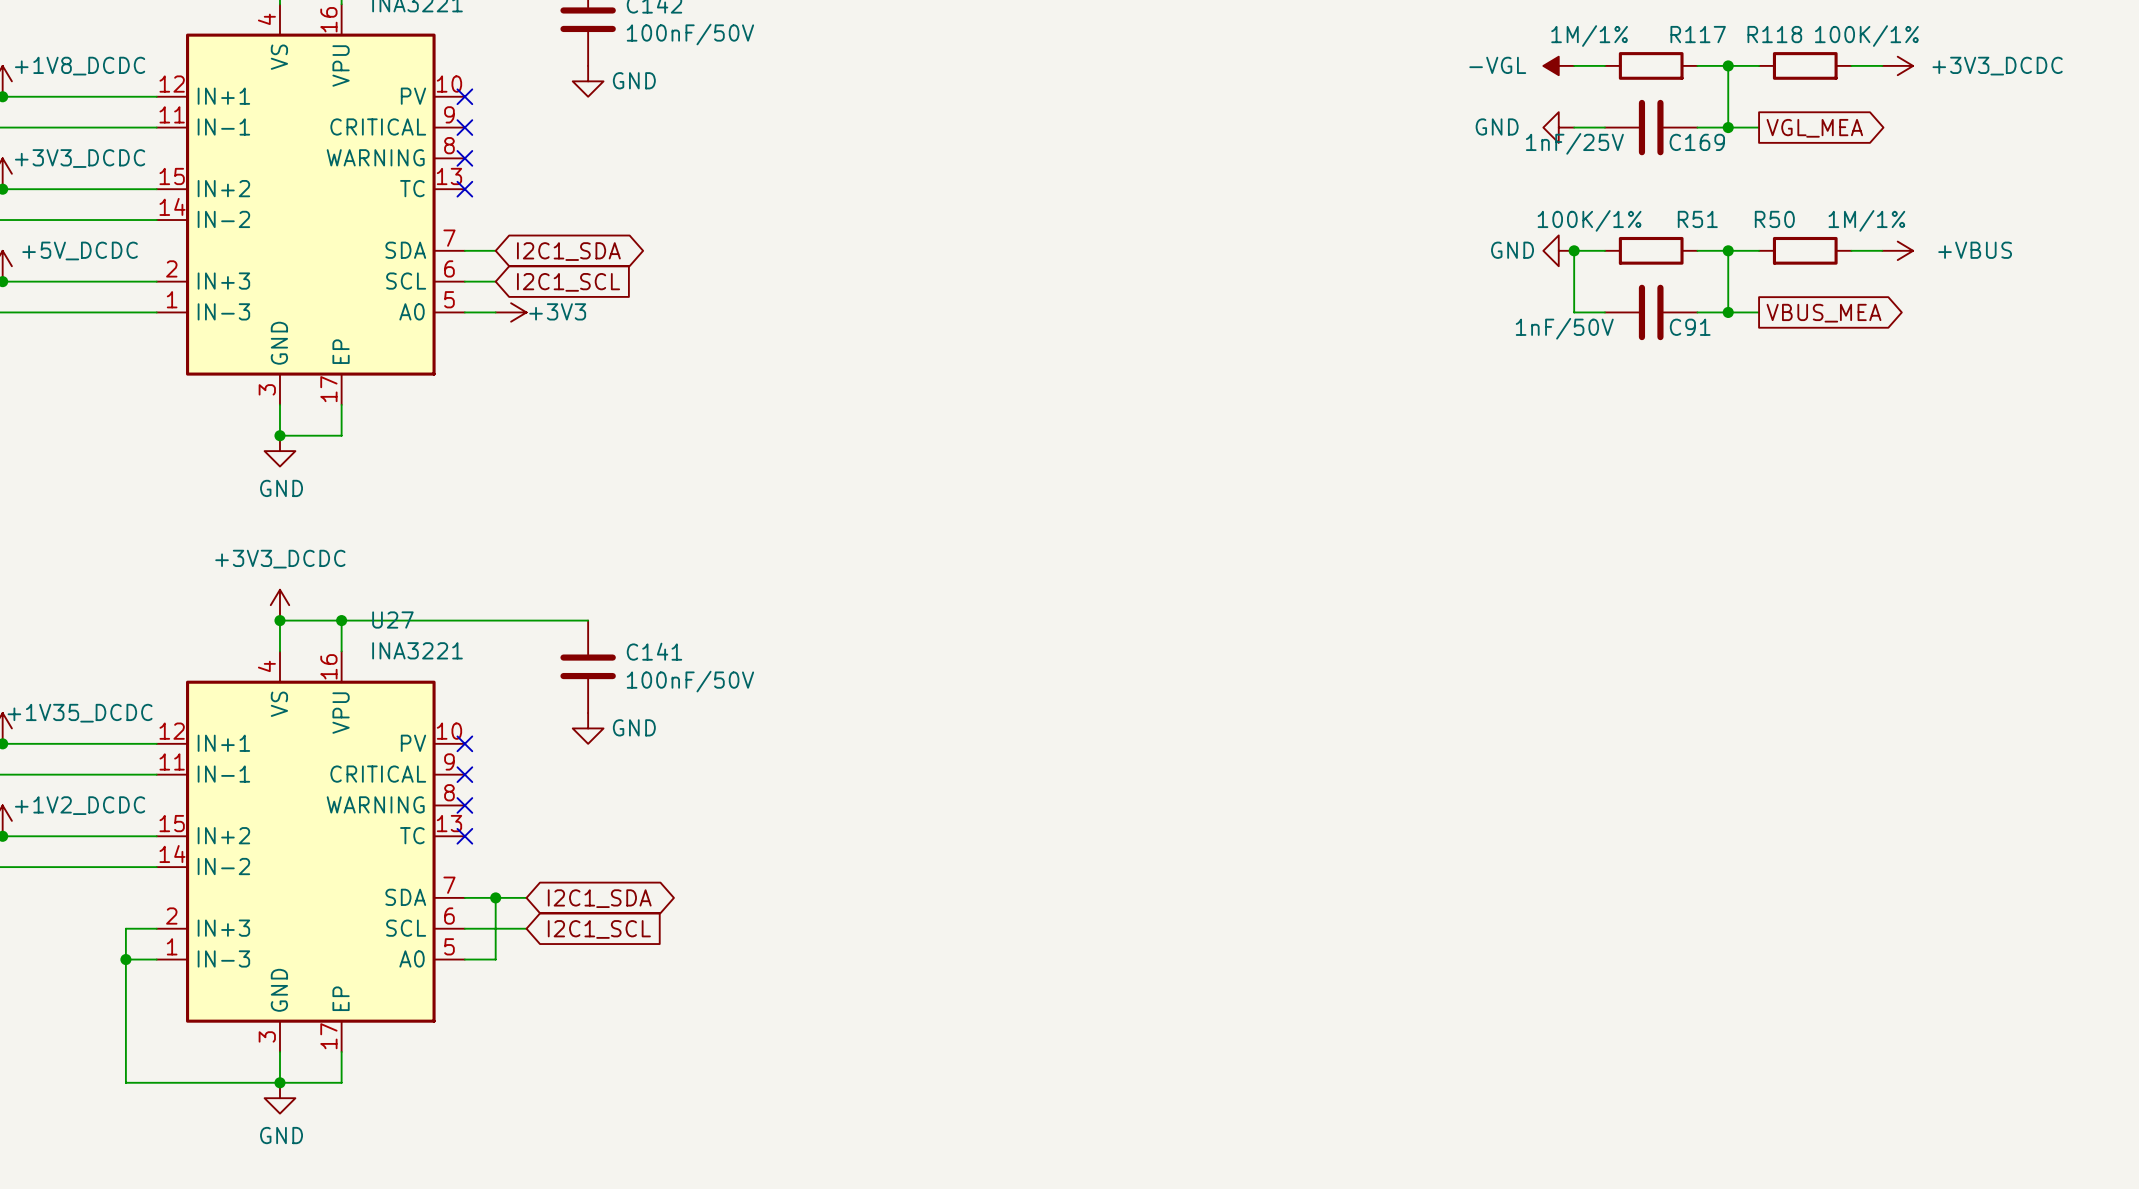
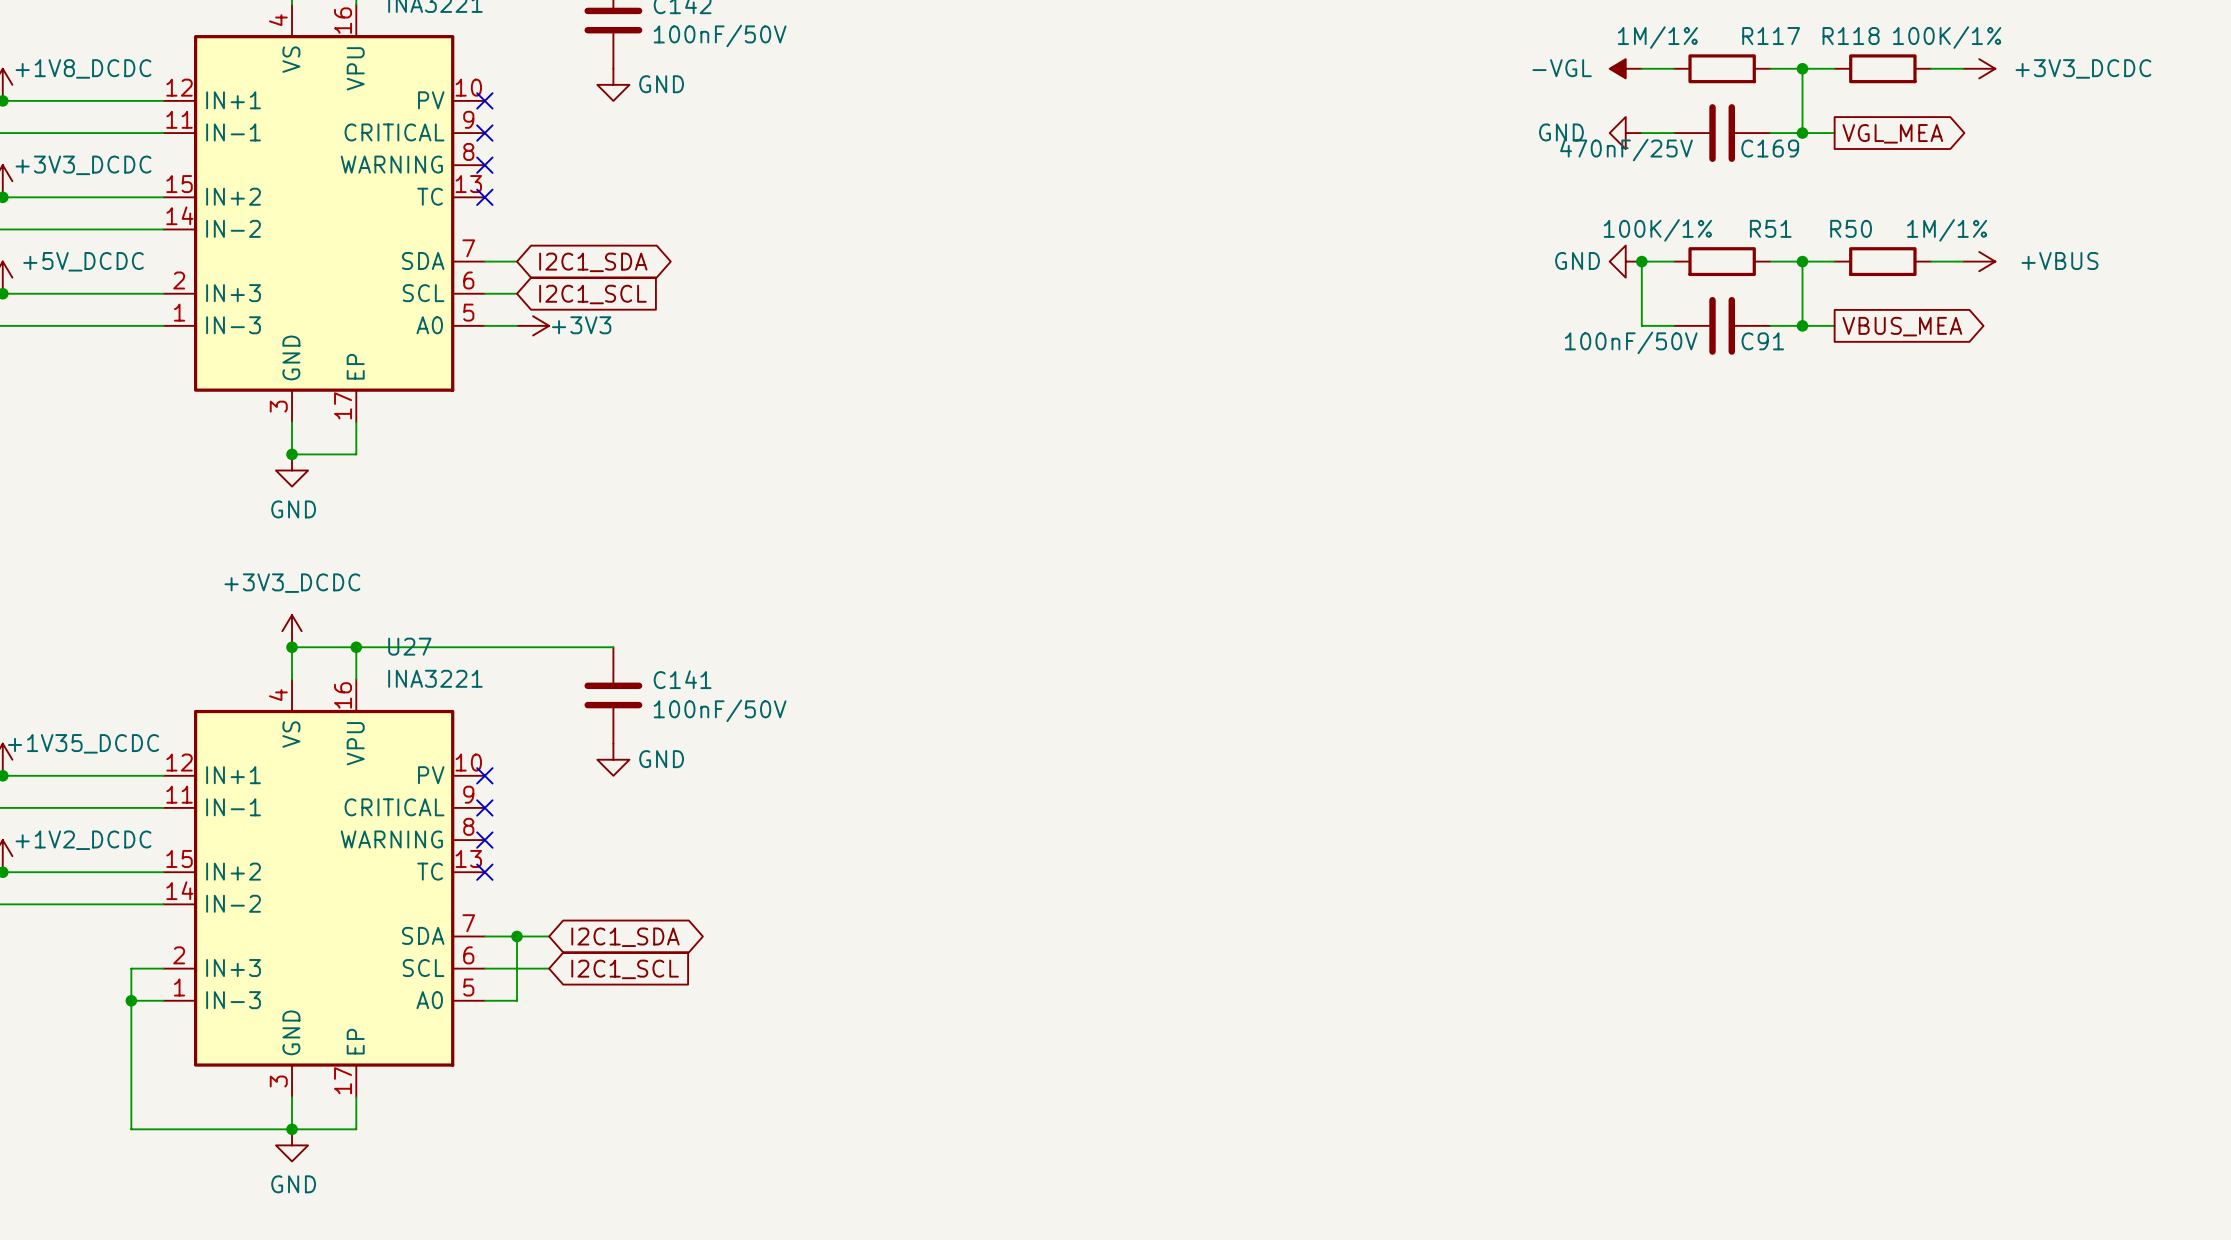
C169 value: 1nF/25V (1574, 143) -> 470nF/25V (1626, 150)
C91 value: 1nF/50V (1564, 328) -> 100nF/50V (1631, 342)

